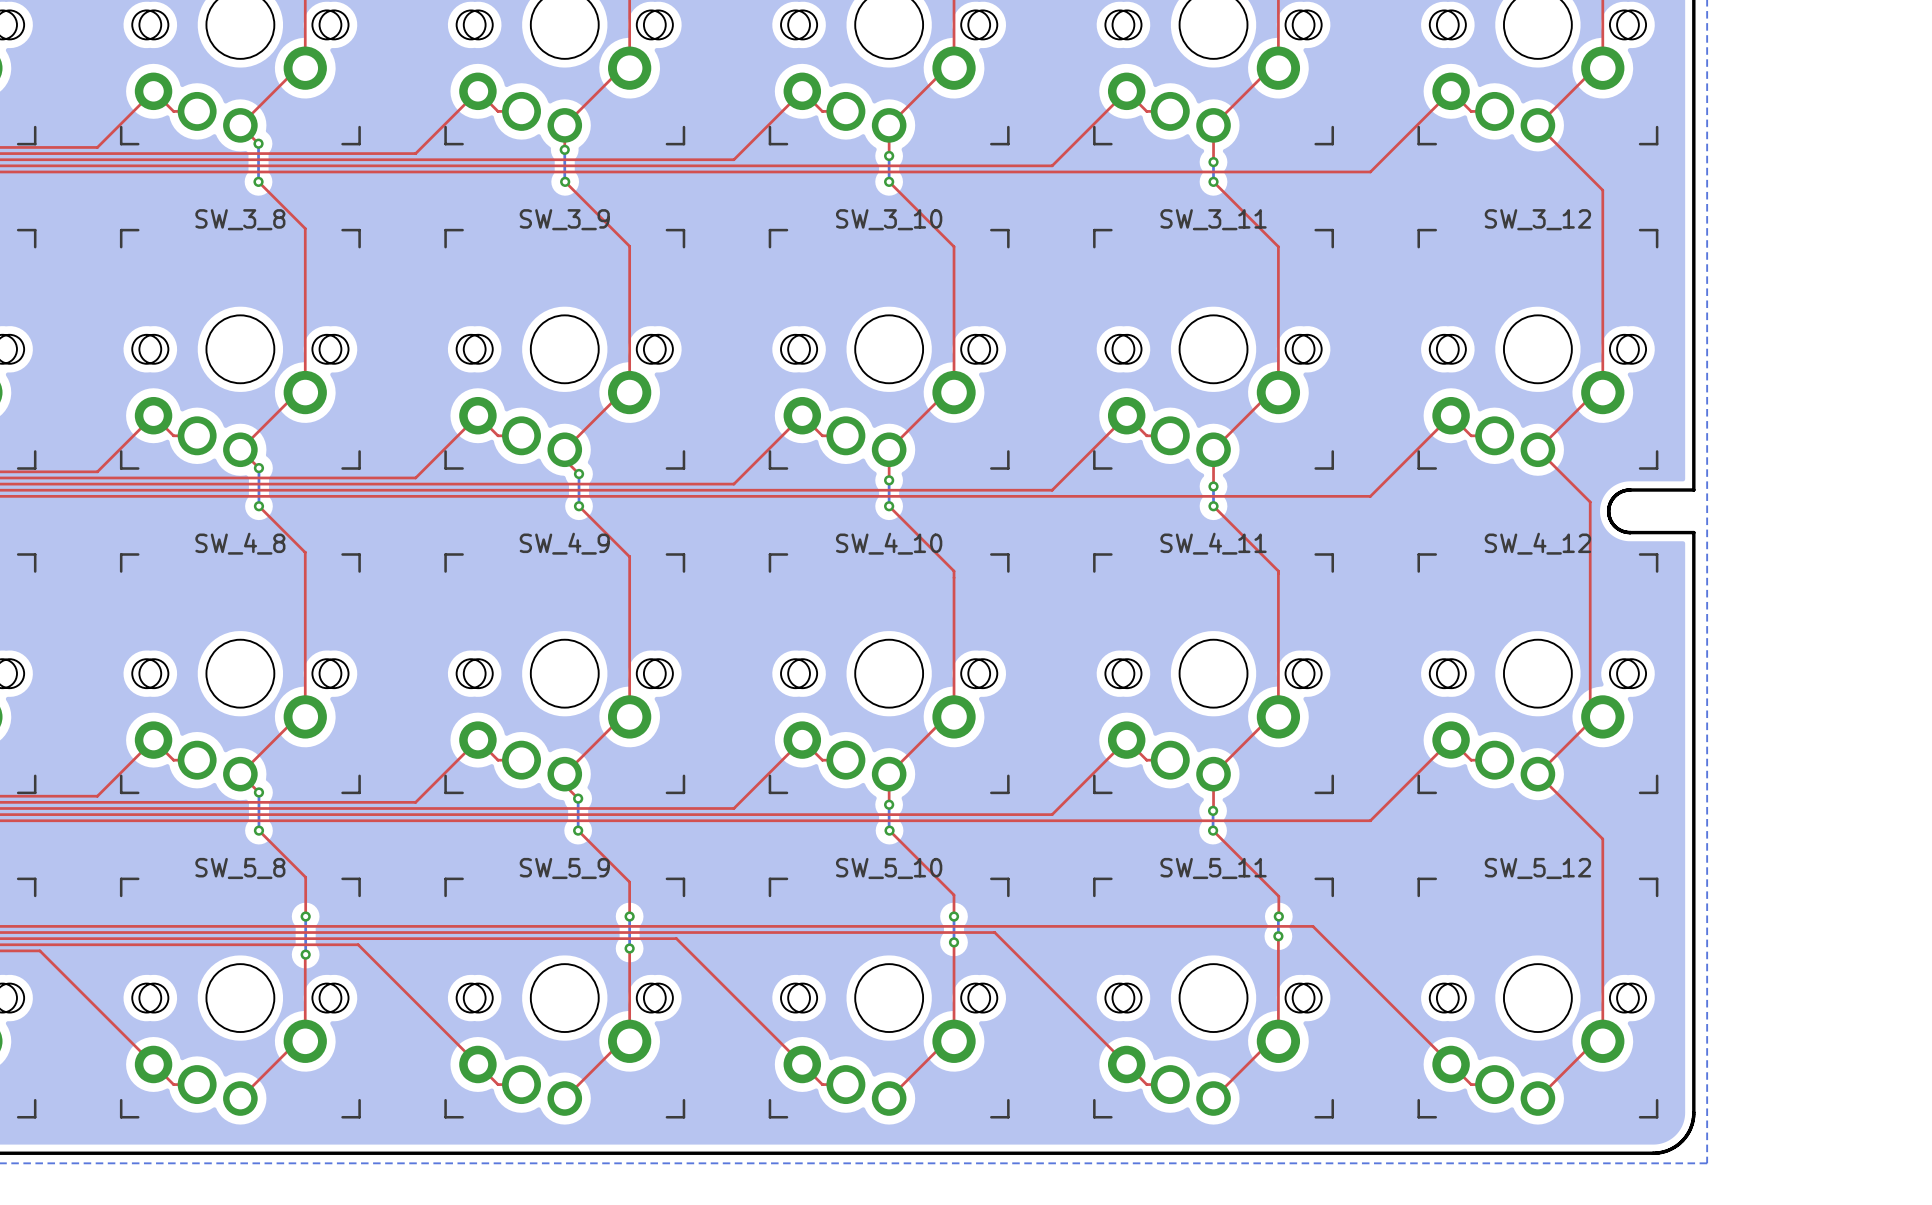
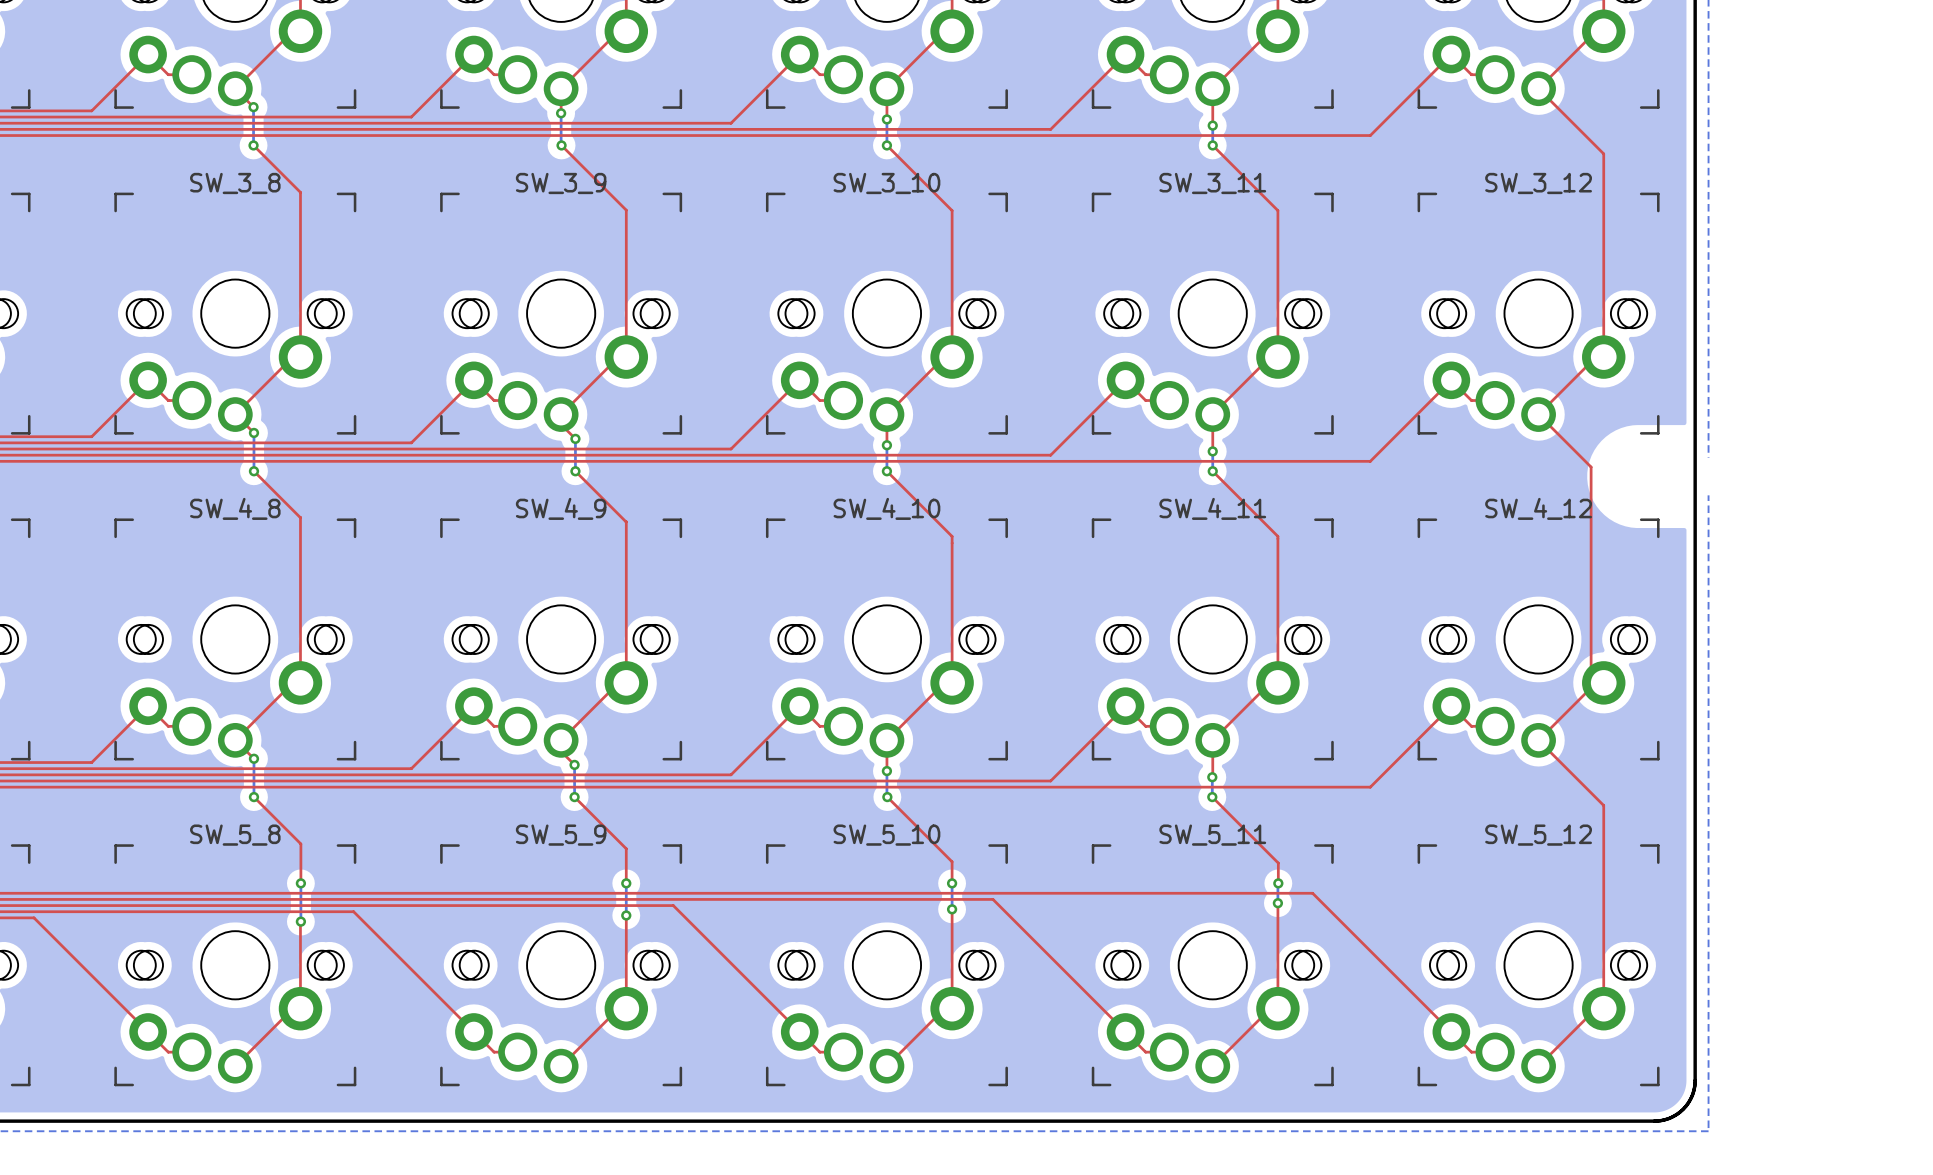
board edge: (1693, 490) (1628, 490) (1618, 493) (1609, 504) (1609, 517) (1617, 528) (1629, 532) -> (1695, 454) (1695, 497)
board edge: (1630, 532) (1693, 532) -> none

